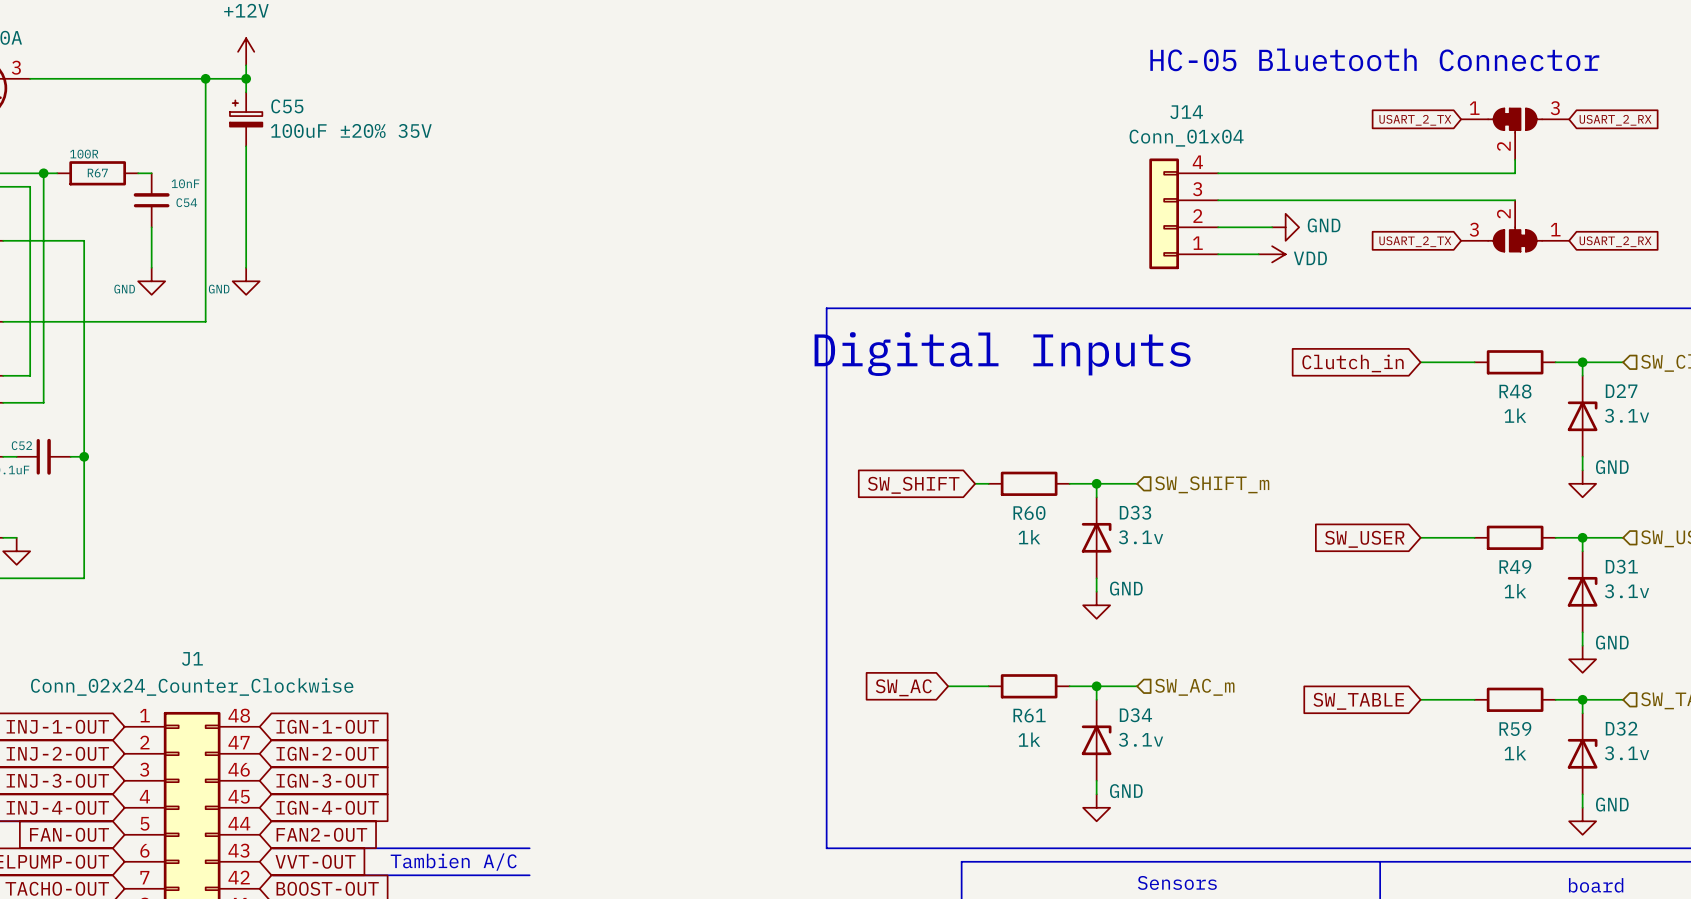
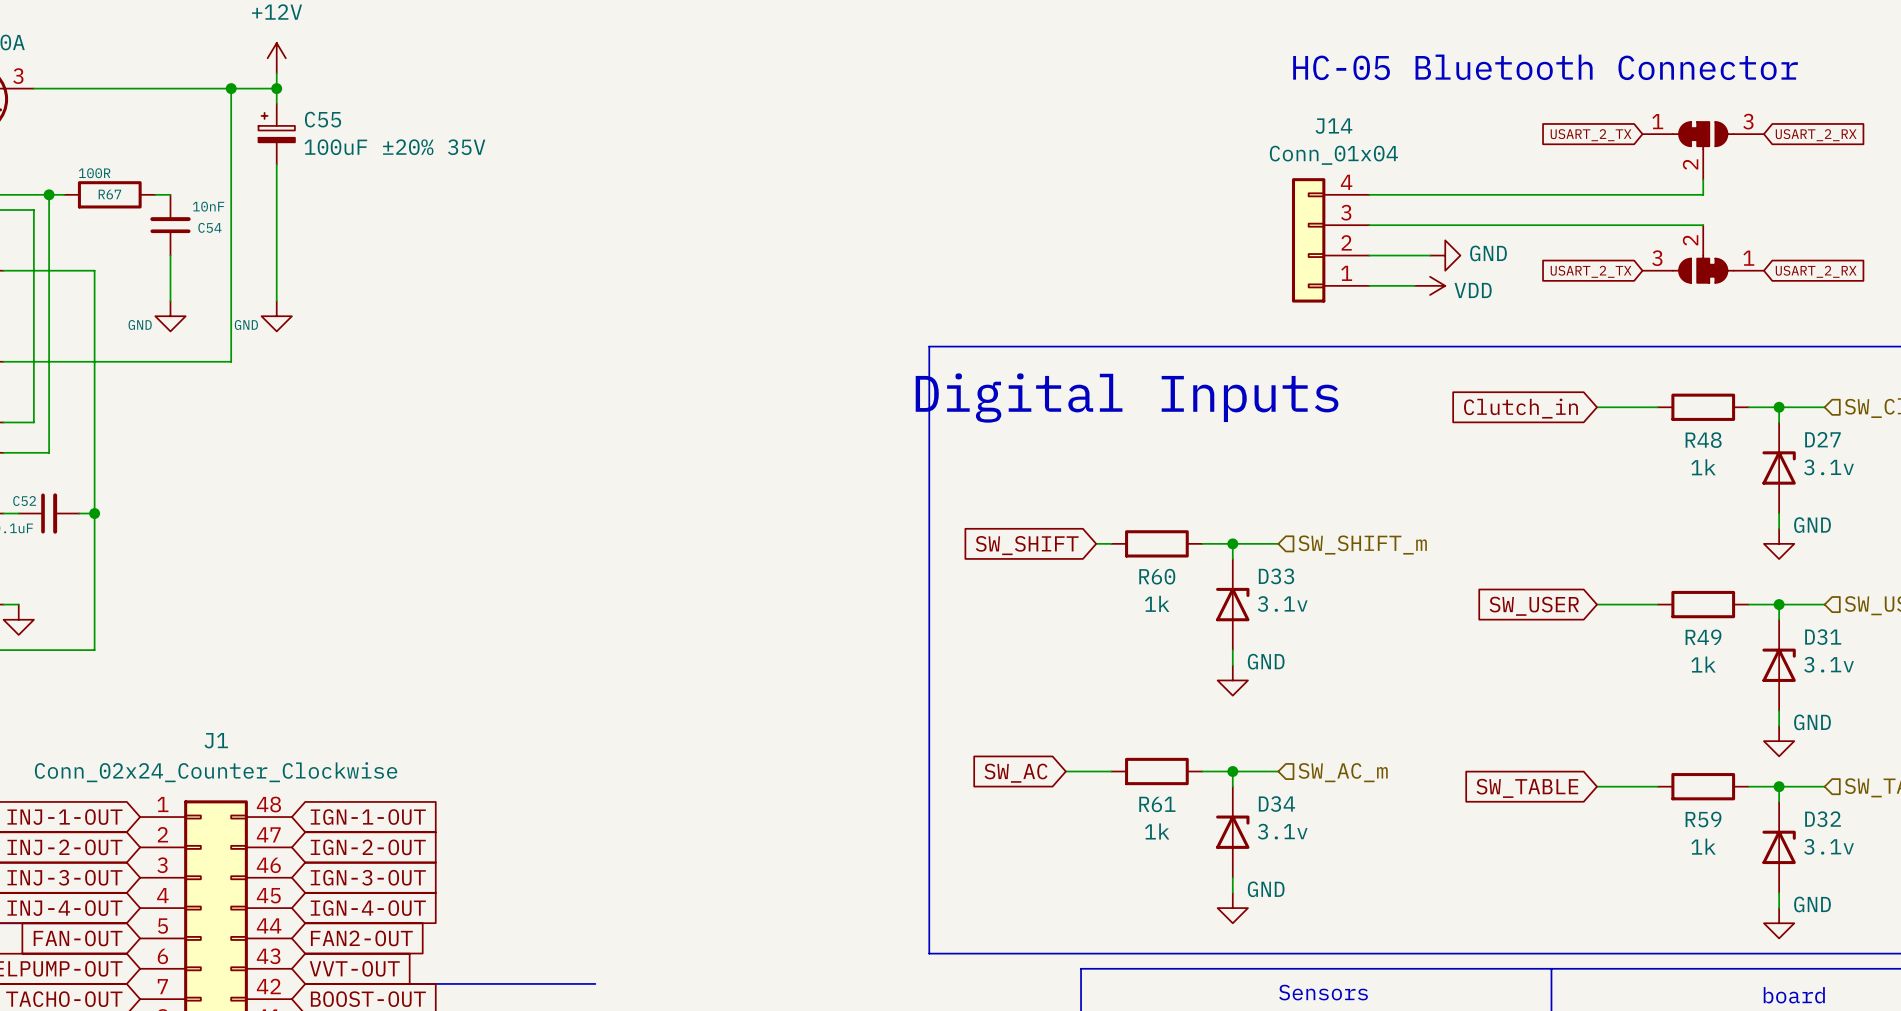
line: (273, 848) (529, 848) -> none
text: Tambien A/C (453, 862) -> none

